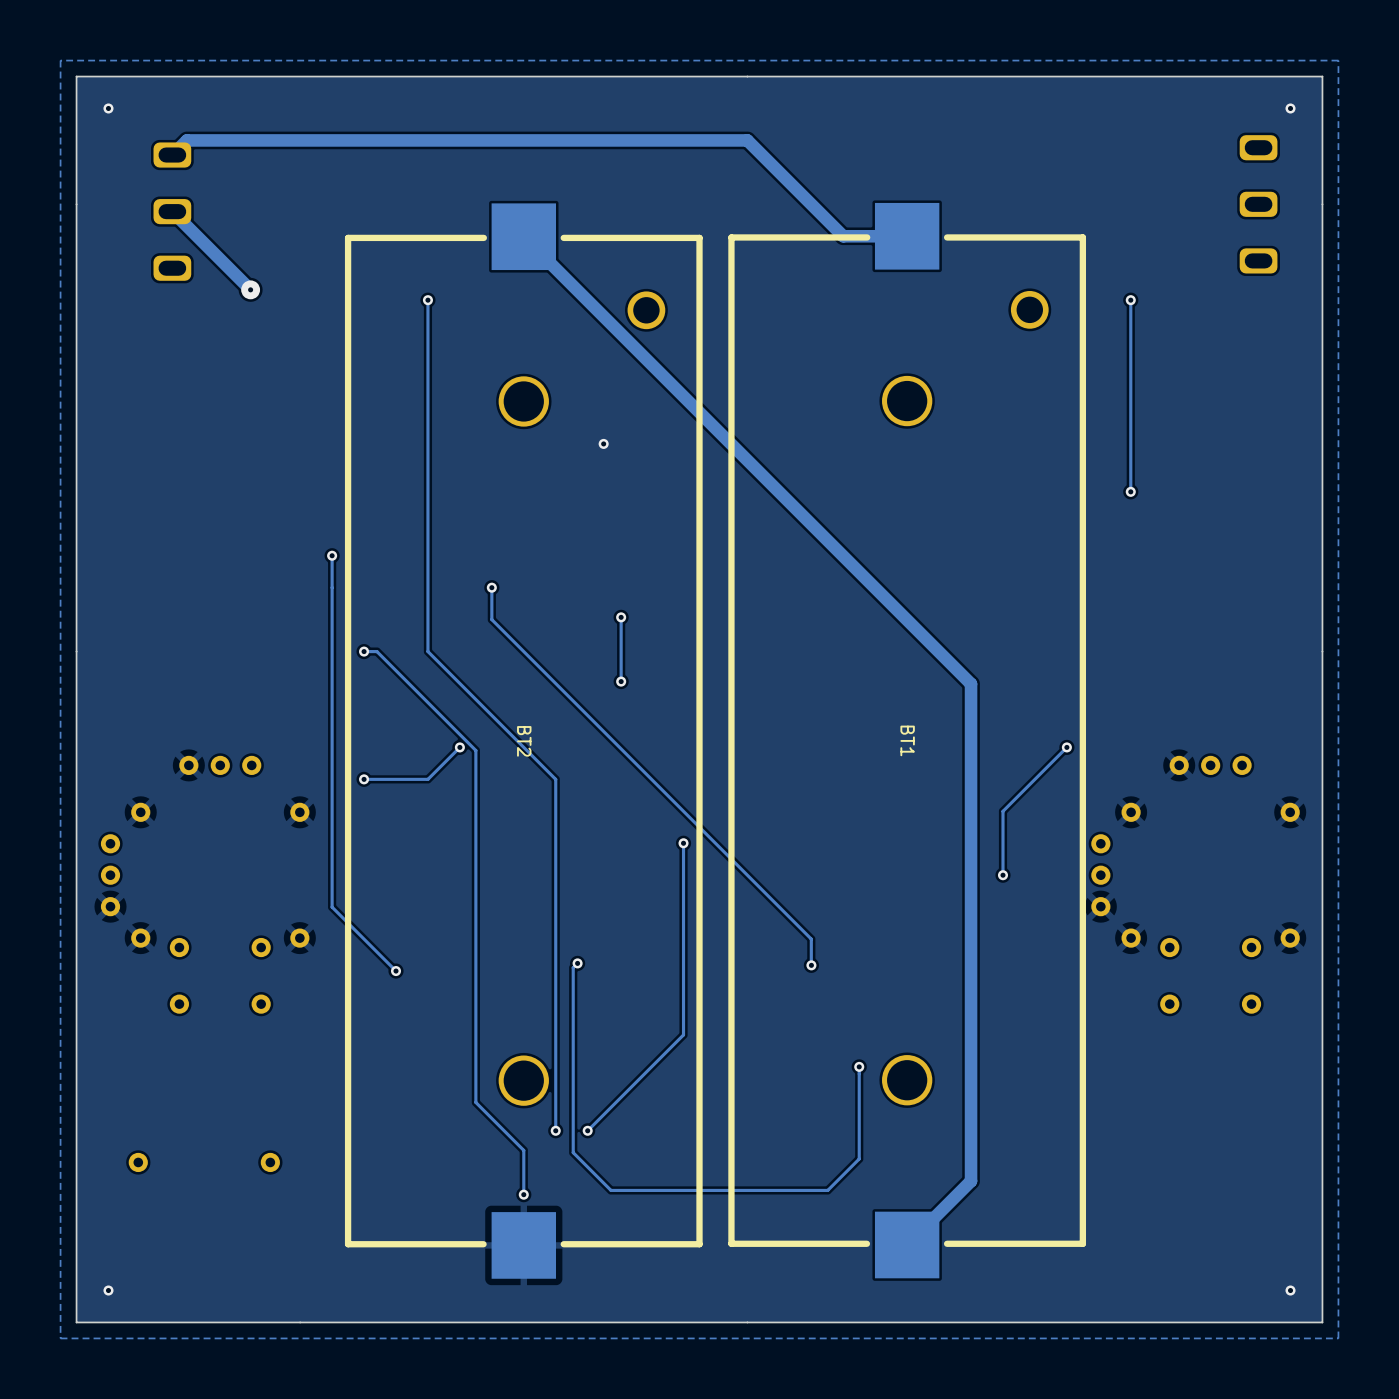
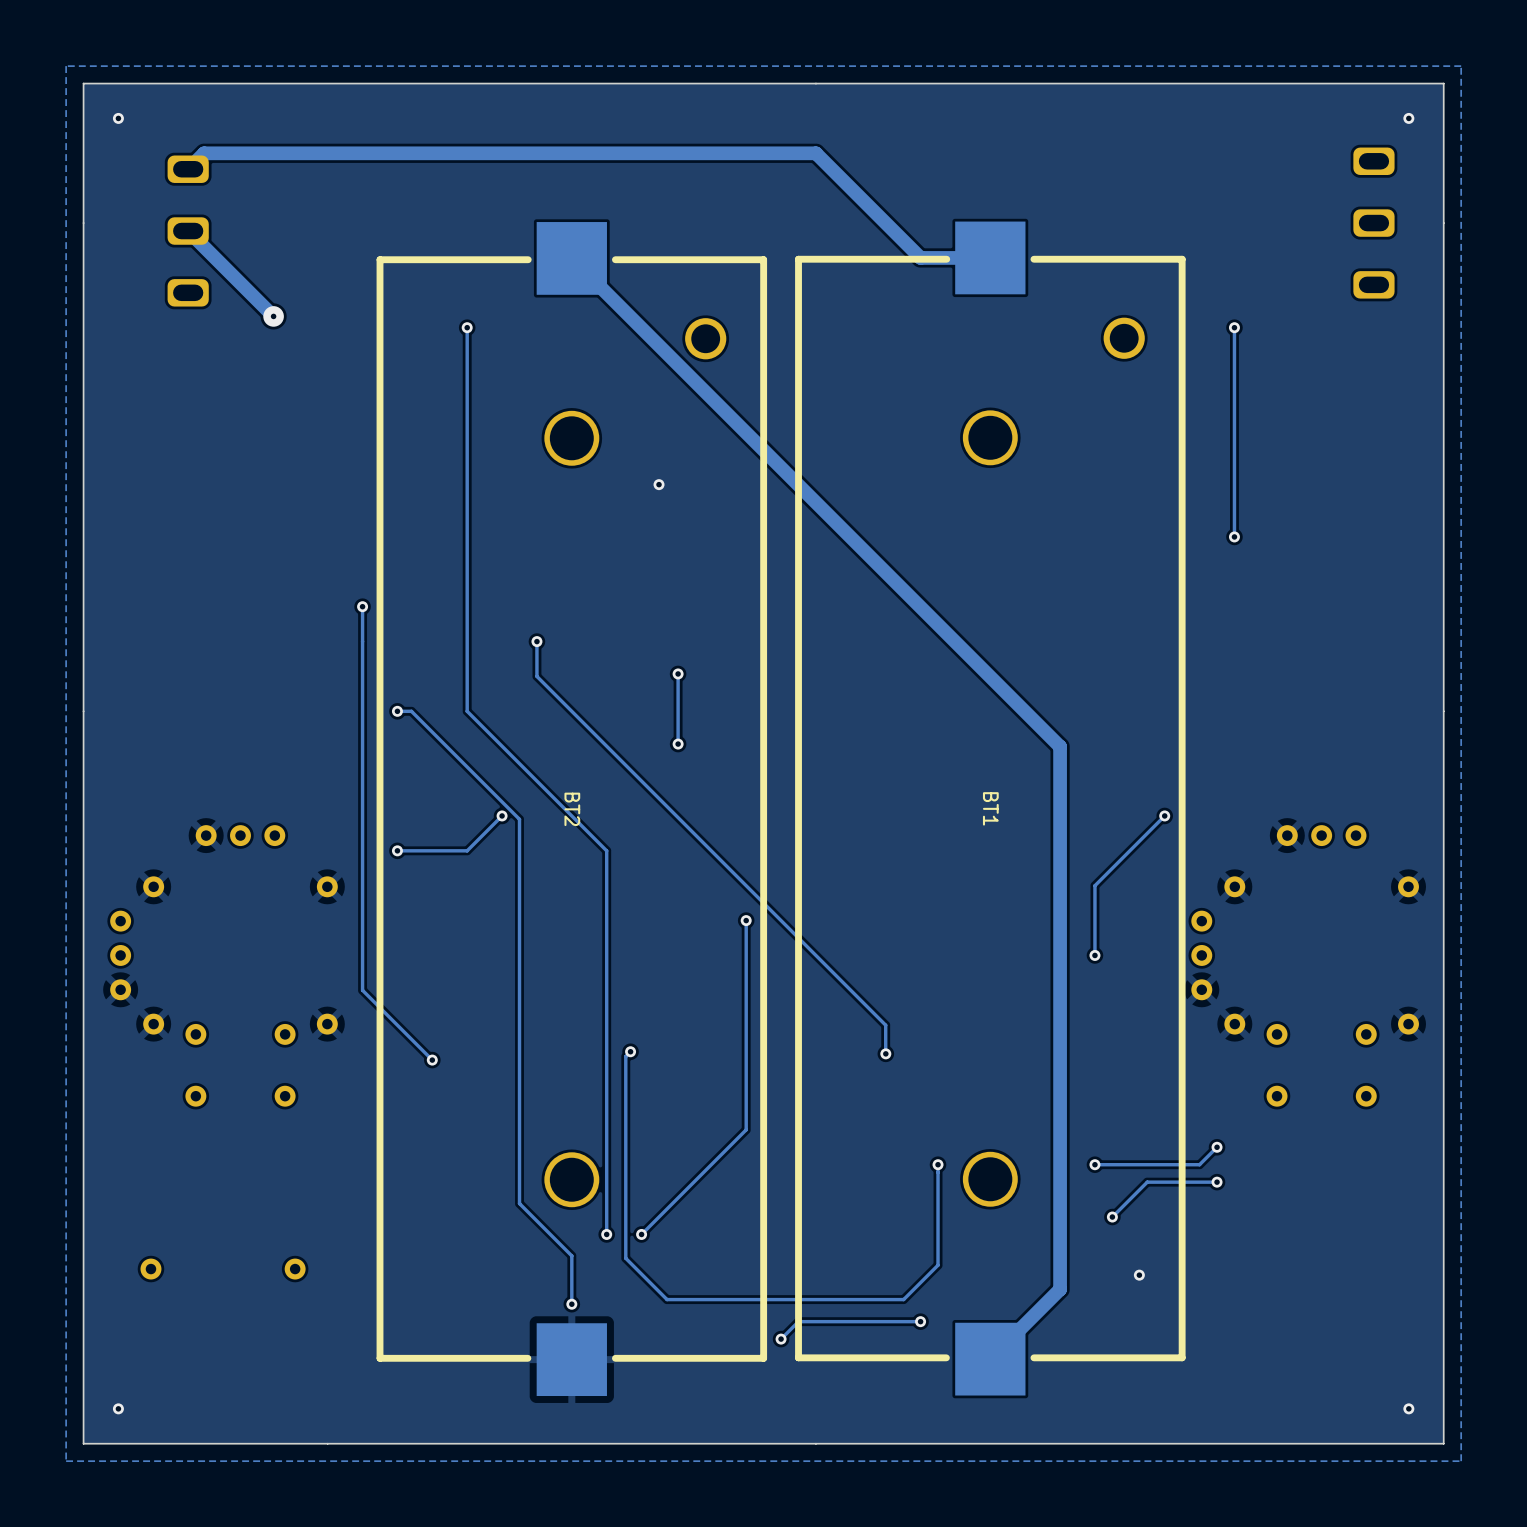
track: none -> (1217, 1147) (1199, 1164) (1094, 1164)
via: none -> (1217, 1147)
via: none -> (1094, 1164)
track: none -> (1217, 1182) (1147, 1182) (1112, 1217)
via: none -> (1217, 1182)
via: none -> (1112, 1217)
via: none -> (1139, 1275)
track: none -> (920, 1321) (798, 1321) (781, 1339)
via: none -> (920, 1321)
via: none -> (781, 1339)

